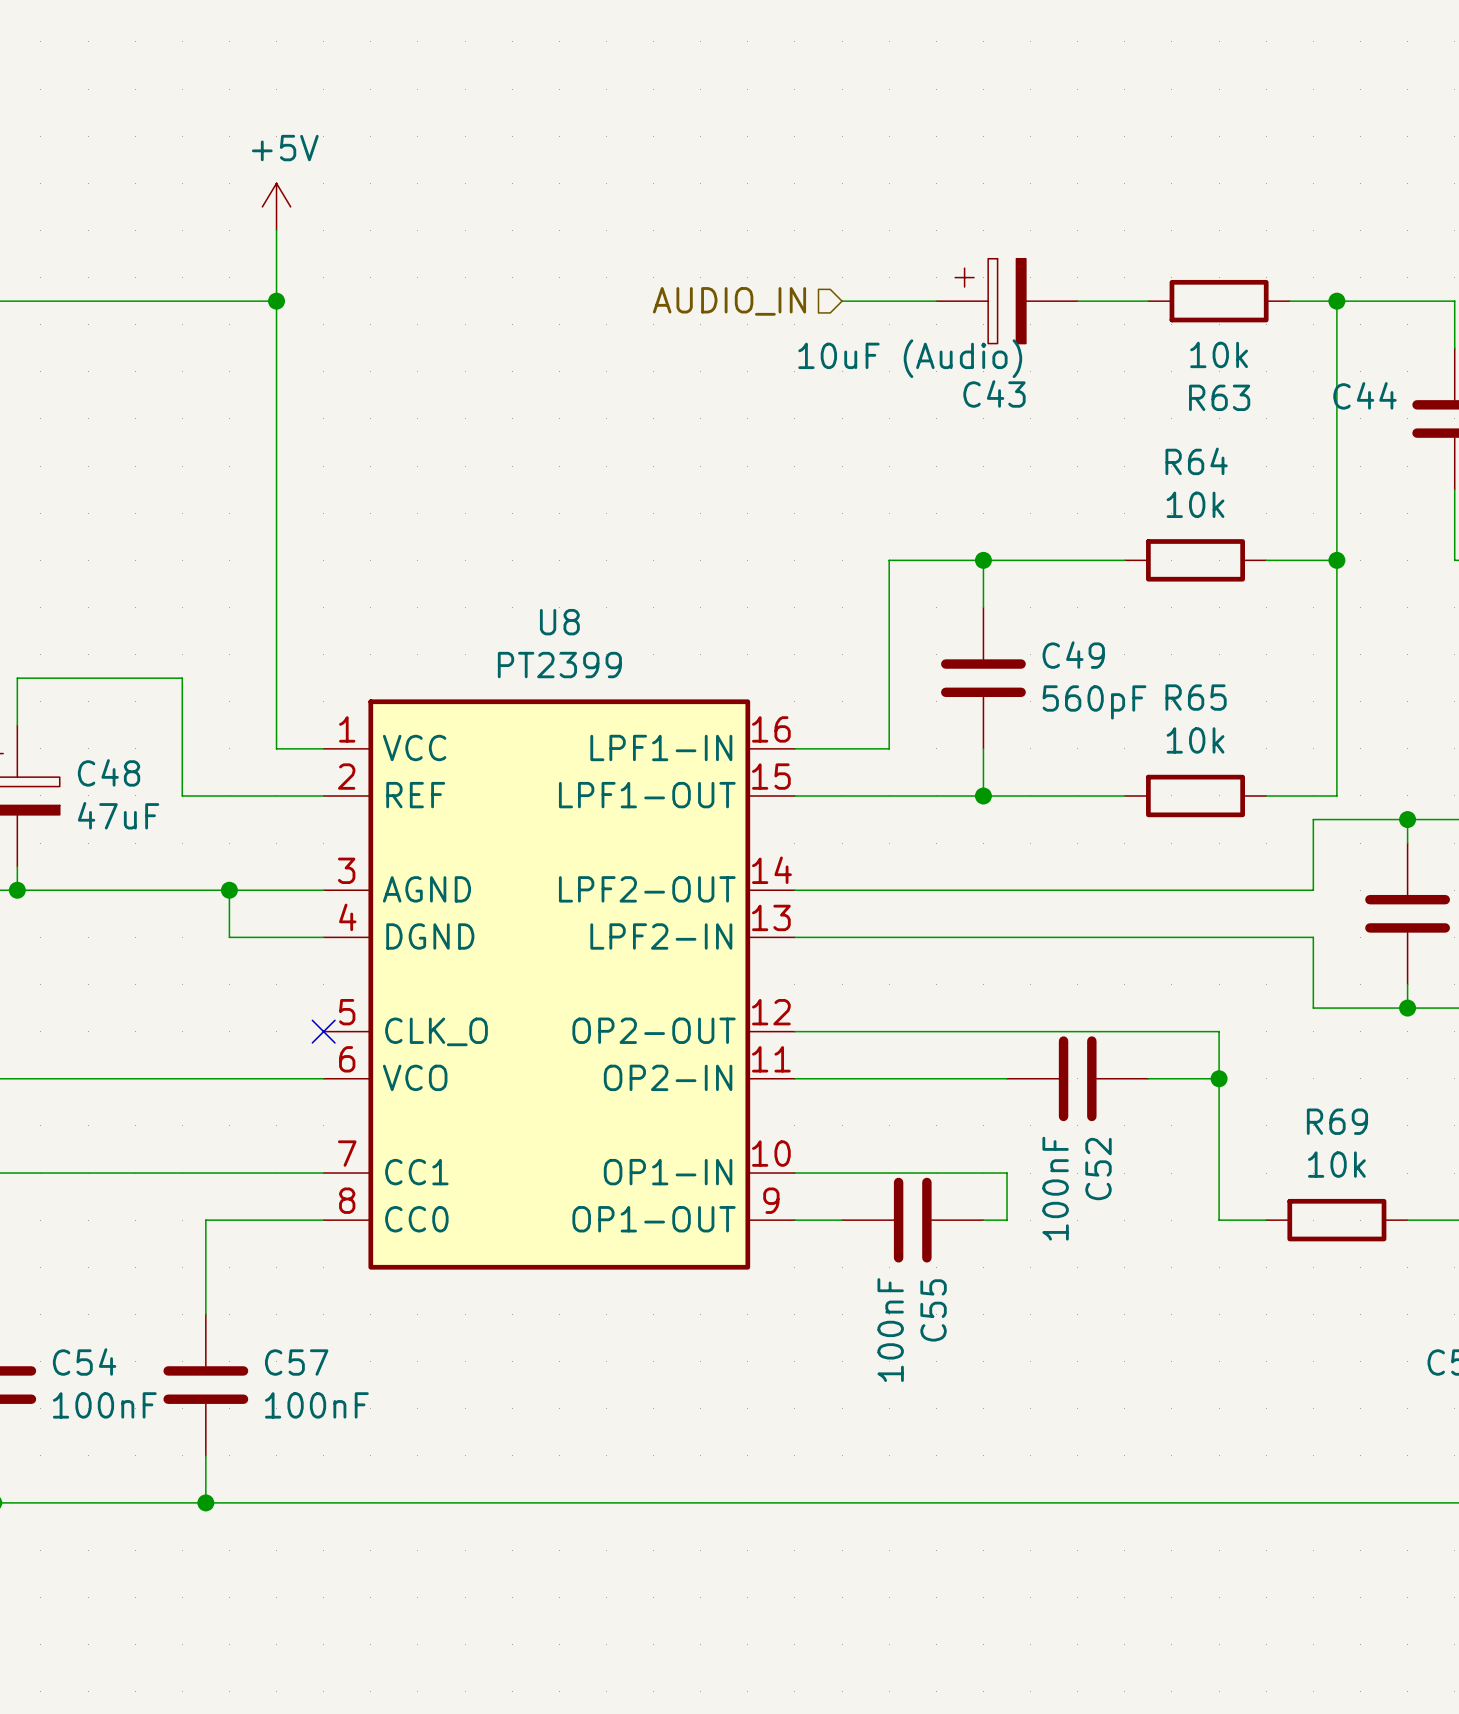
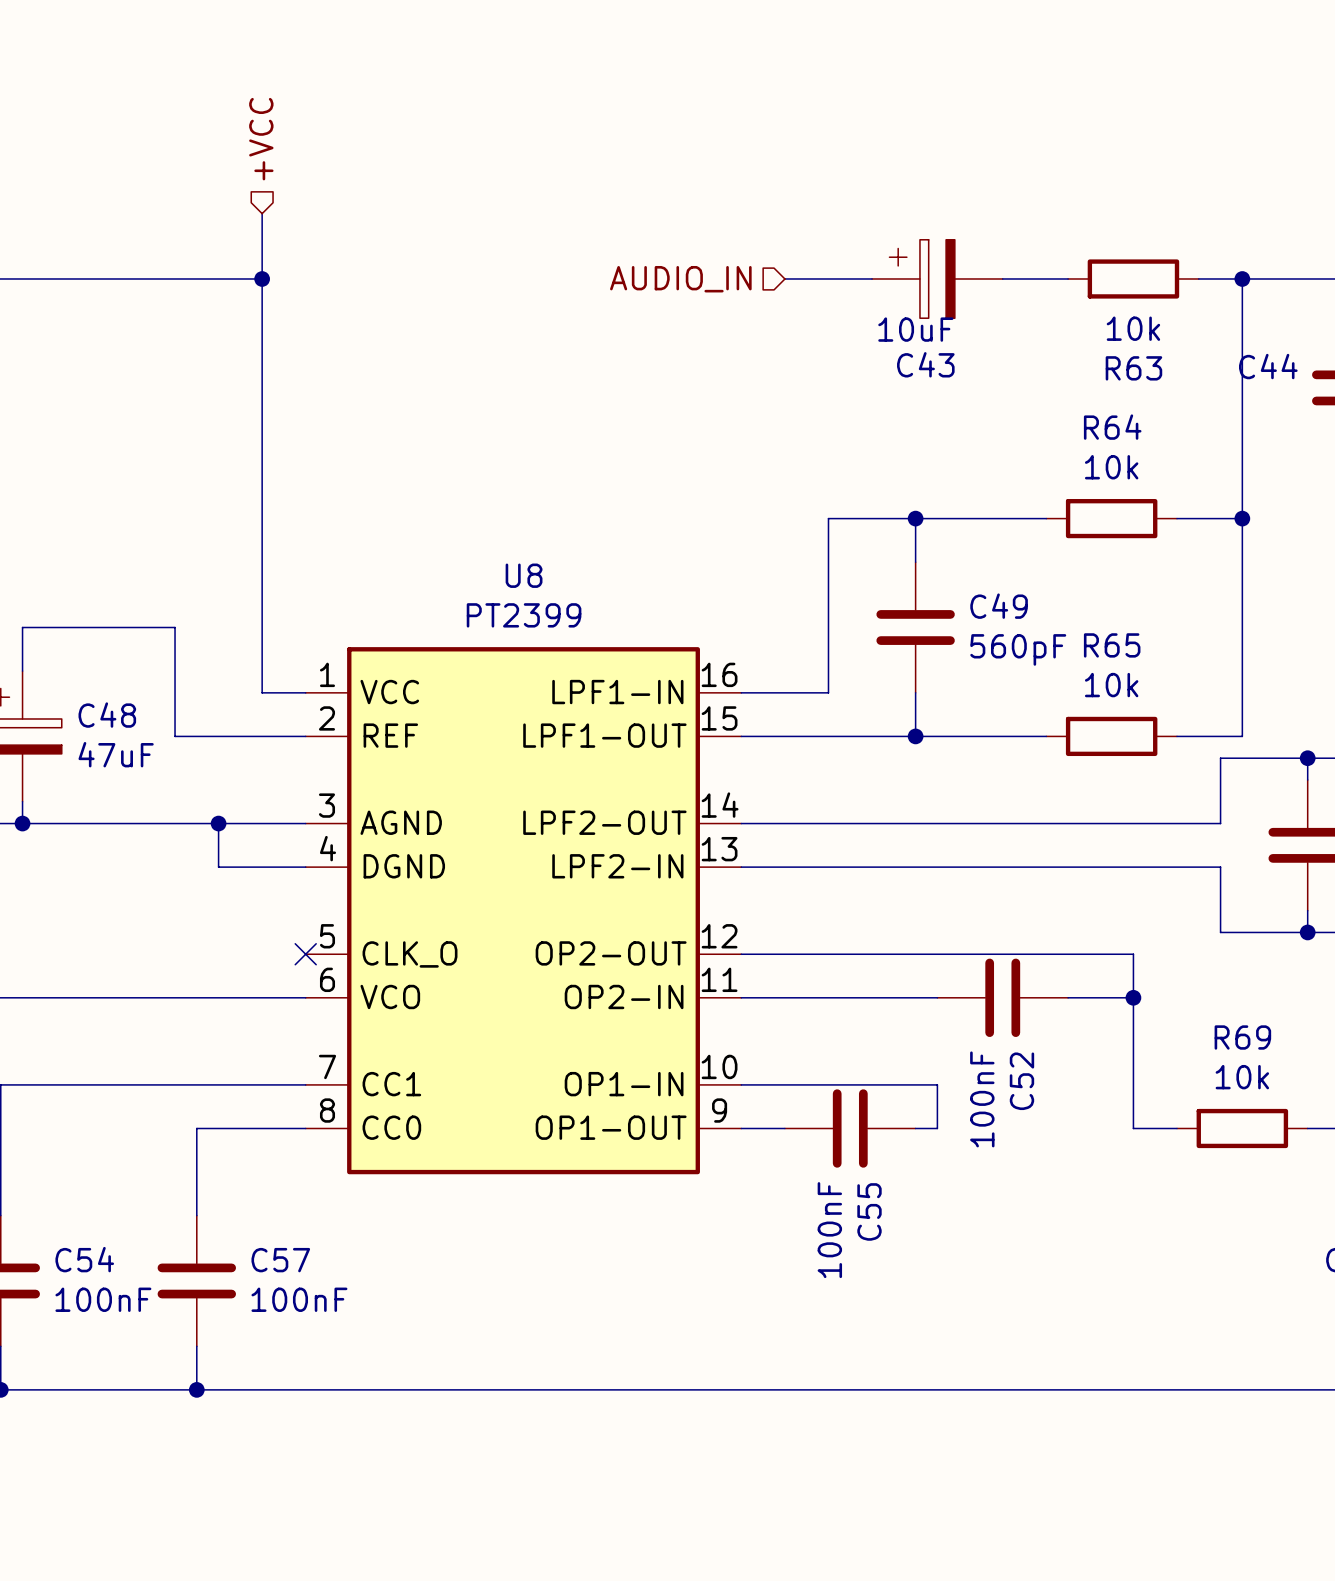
hierarchical label: none -> +VCC (261, 139)
power symbol: +5V (276, 206) -> none
C43 value: 10uF (Audio) (910, 358) -> 10uF (915, 329)

